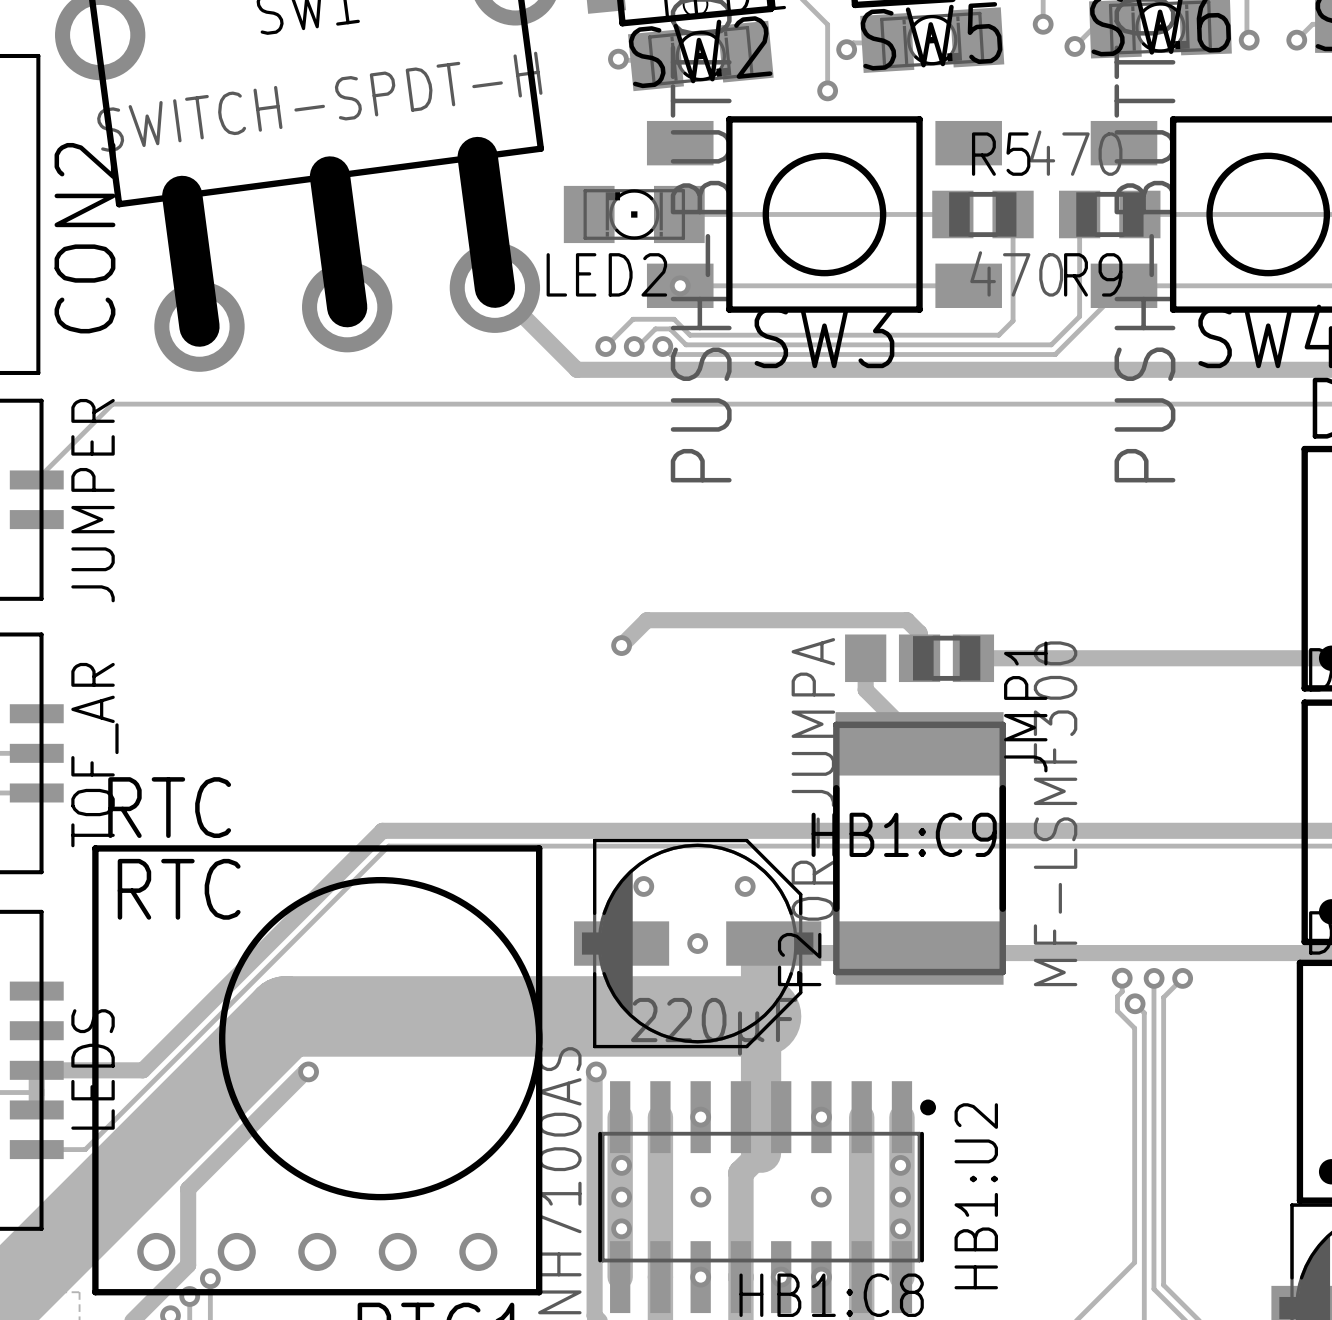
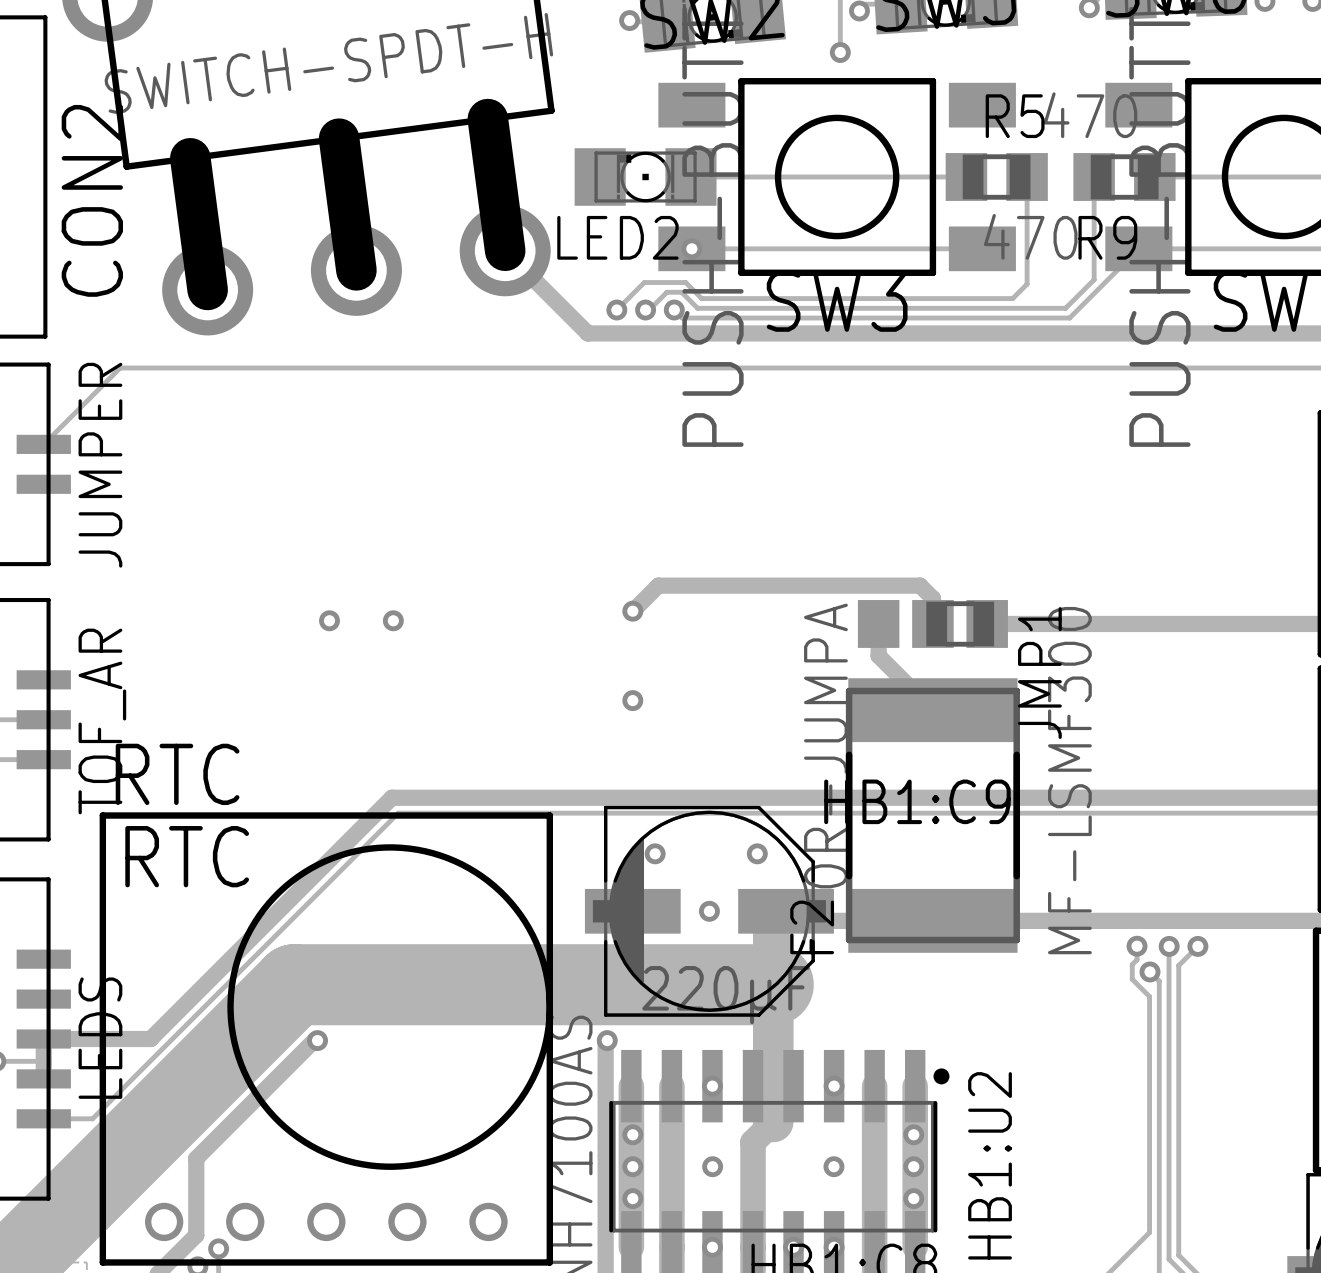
via: none -> (329, 620)
via: none -> (393, 620)
via: none -> (632, 700)

